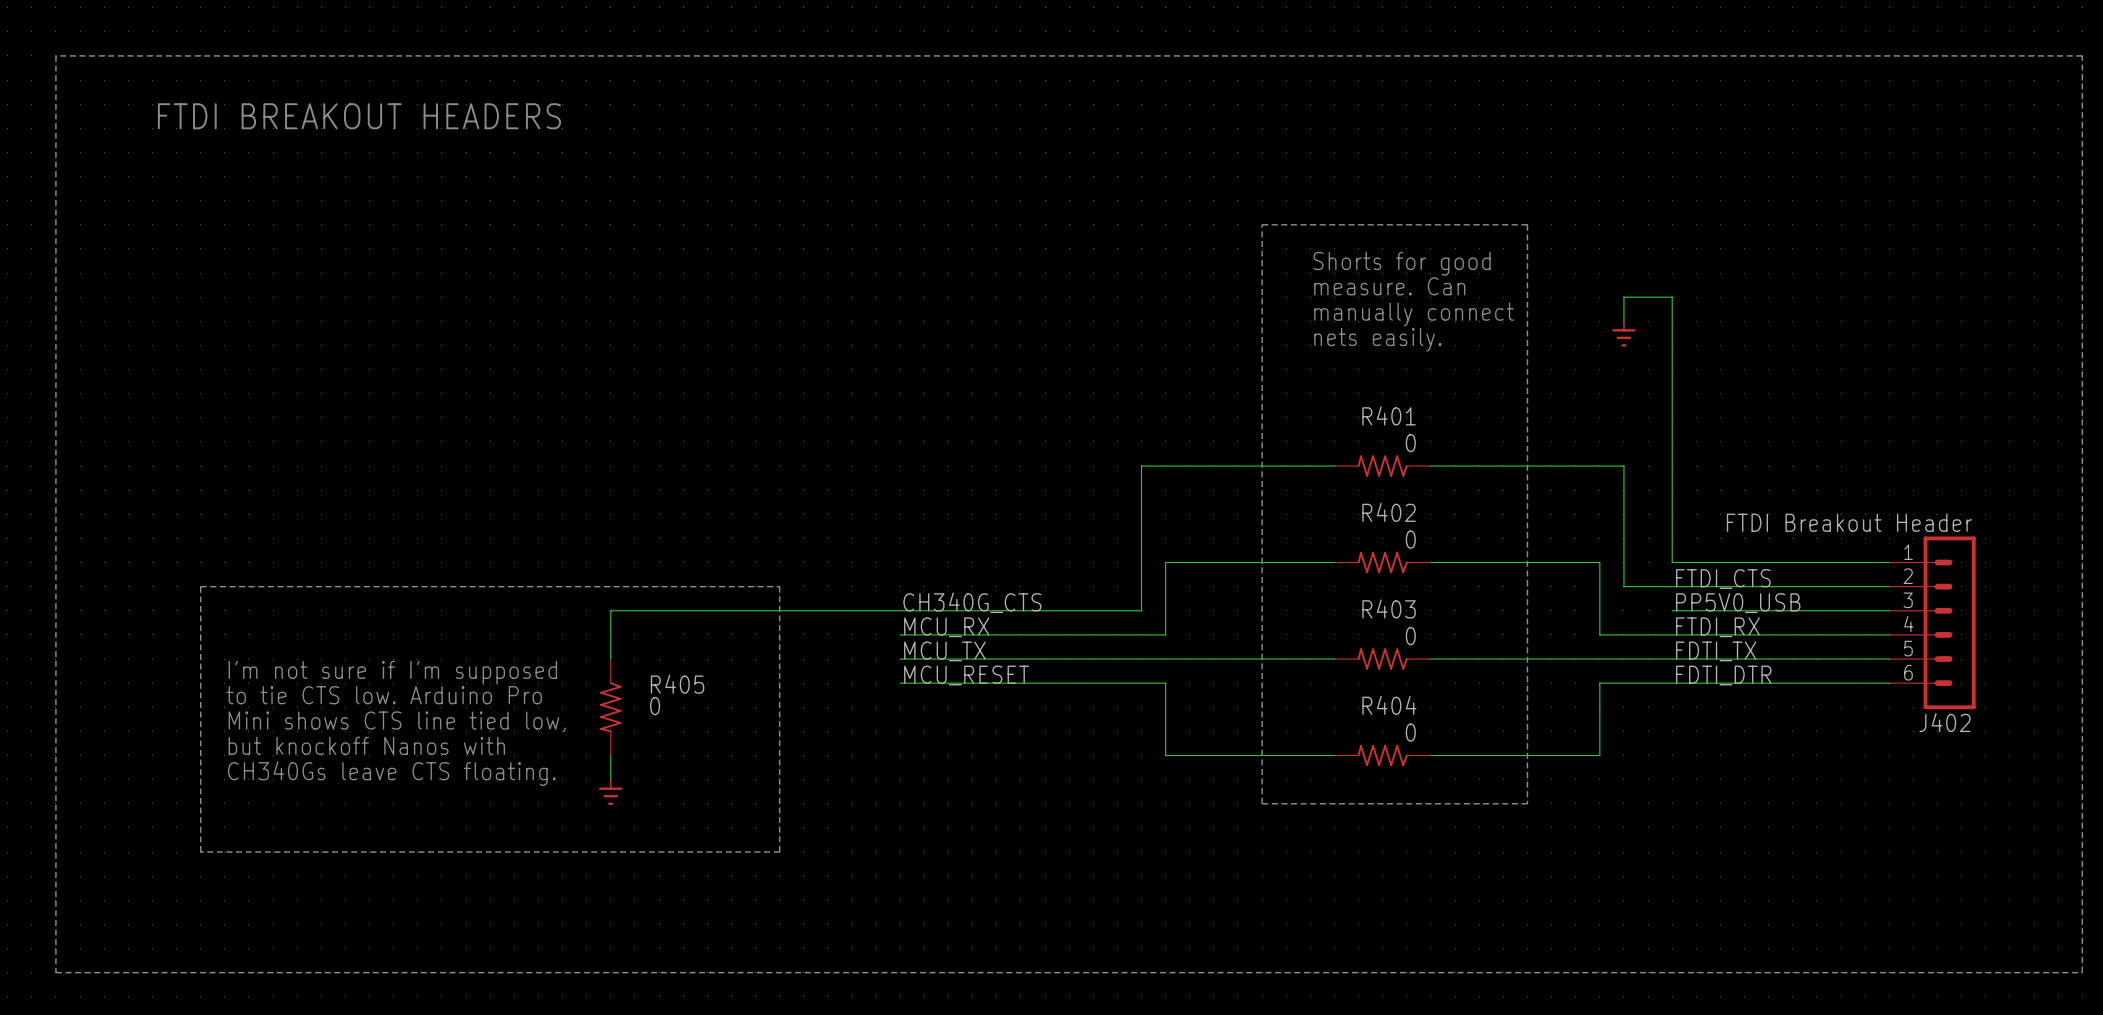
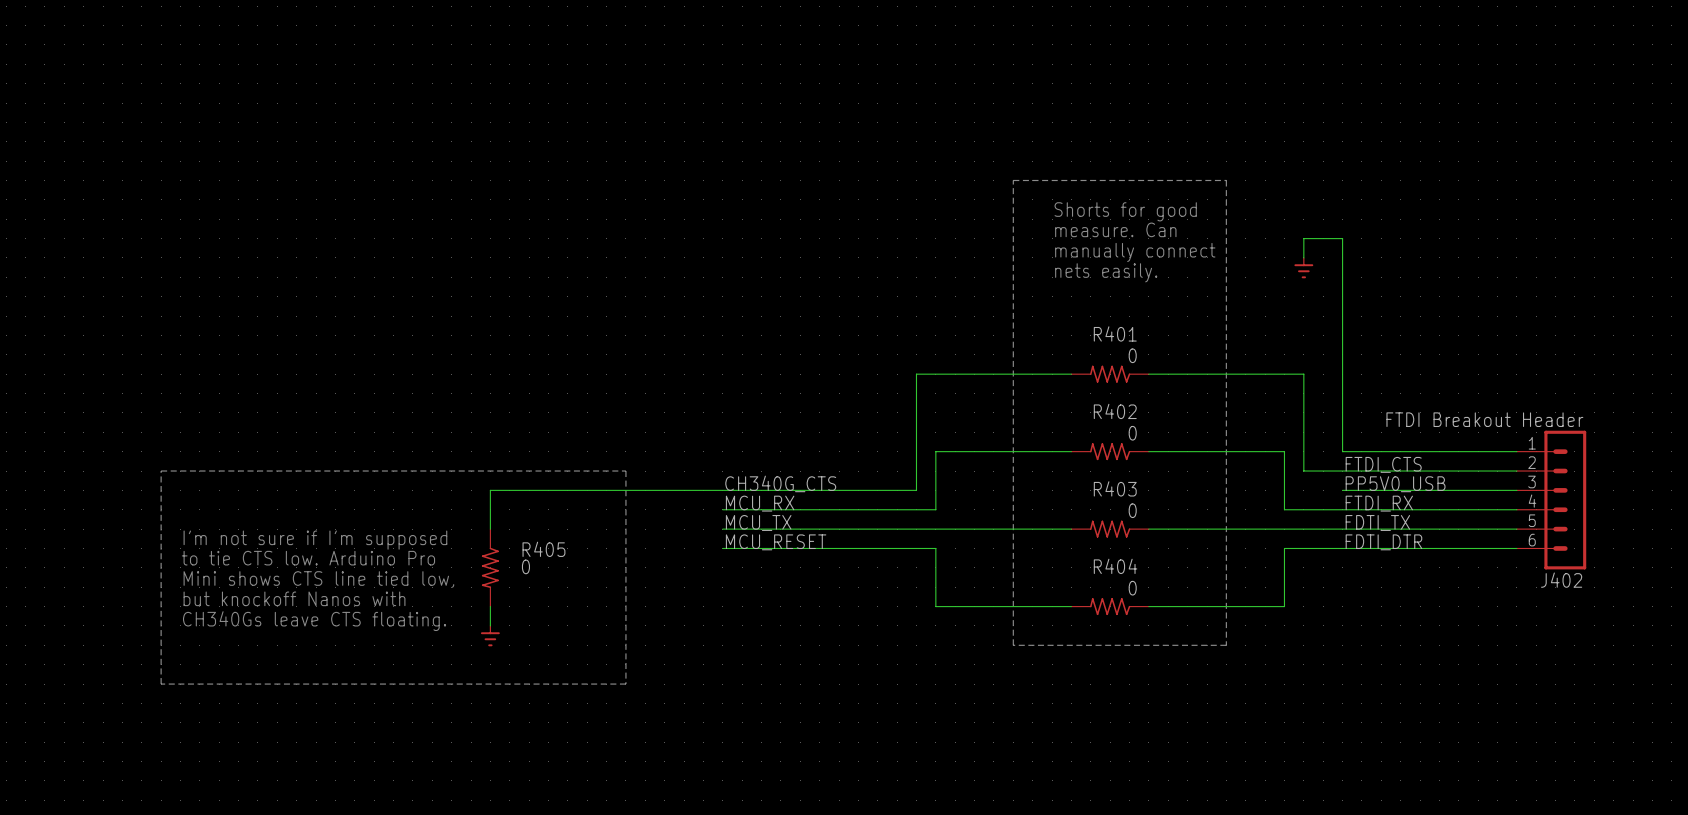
line: (55, 55) (55, 972) (2082, 972) (2082, 55) (55, 55) -> none
text: FTDI BREAKOUT HEADERS (359, 116) -> none

